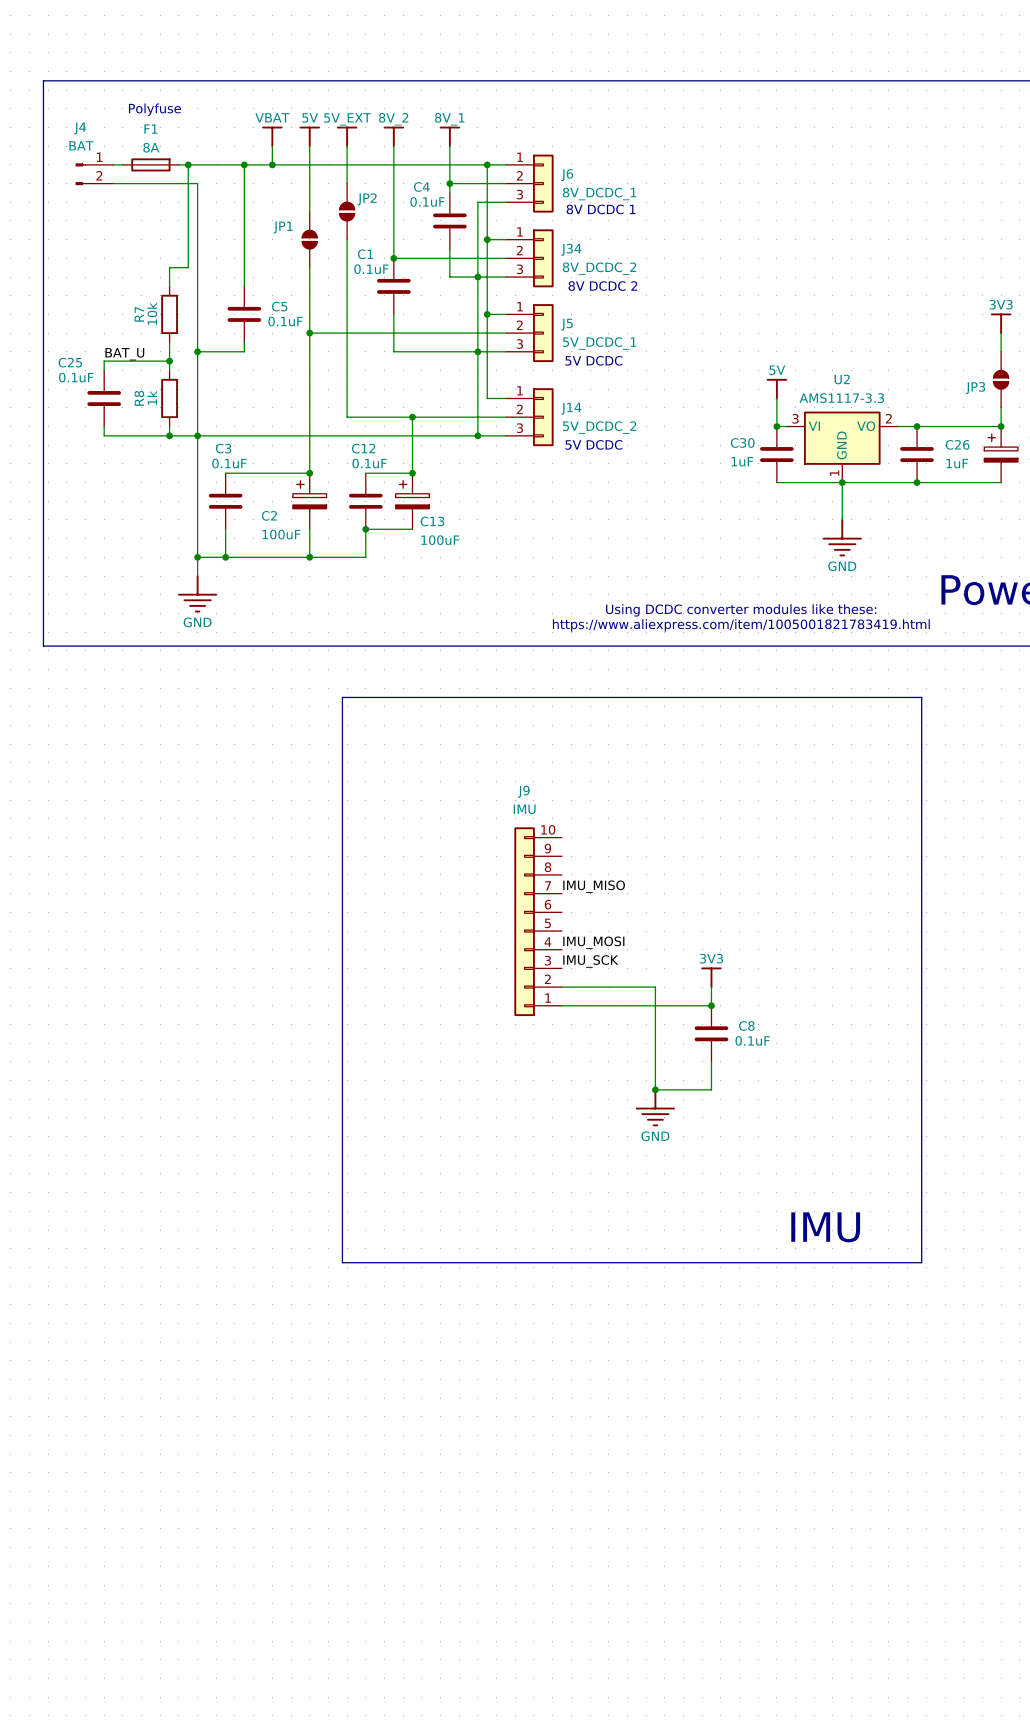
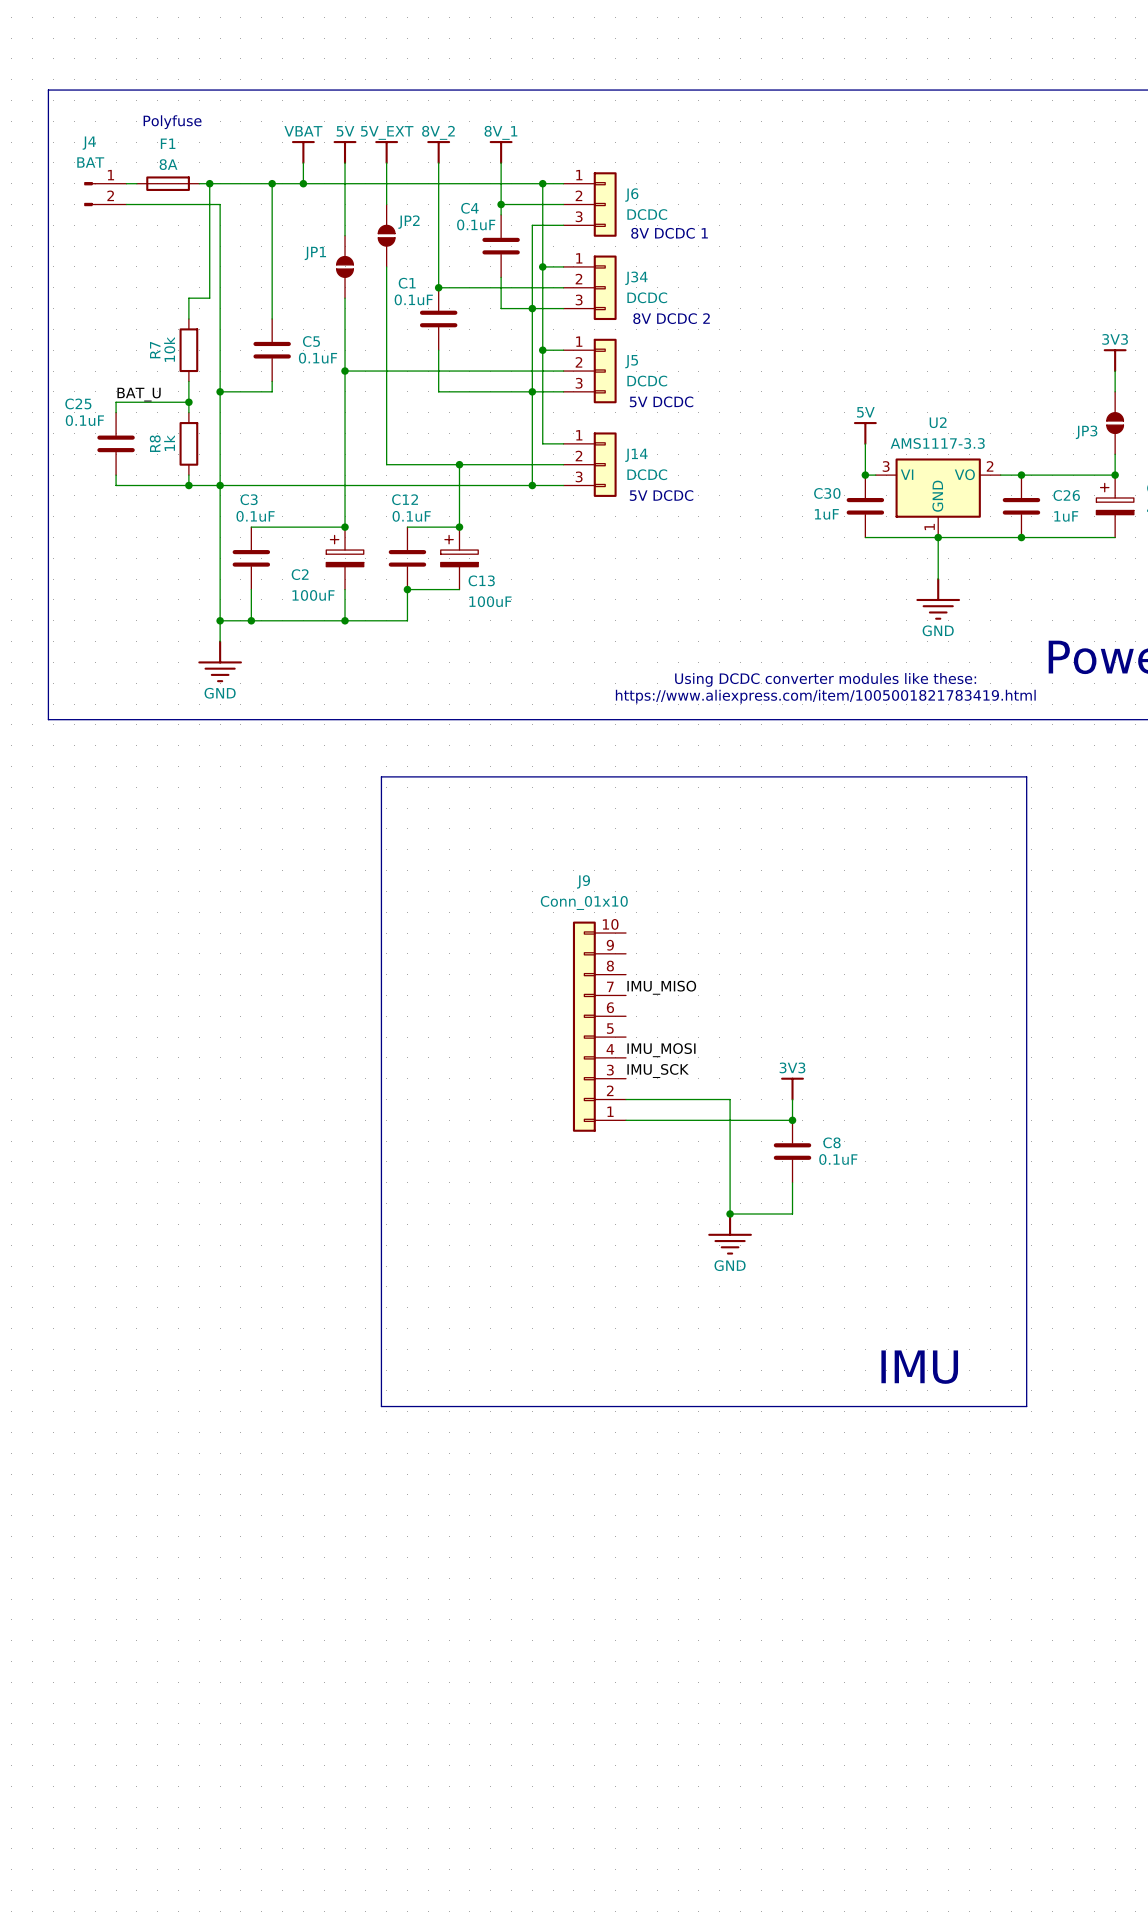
J6 value: 8V_DCDC_1 (599, 194) -> DCDC (647, 214)
J34 value: 8V_DCDC_2 (599, 268) -> DCDC (647, 297)
J5 value: 5V_DCDC_1 (599, 343) -> DCDC (647, 381)
J14 value: 5V_DCDC_2 (599, 427) -> DCDC (647, 474)
J9 value: IMU (524, 809) -> Conn_01x10 (584, 902)

